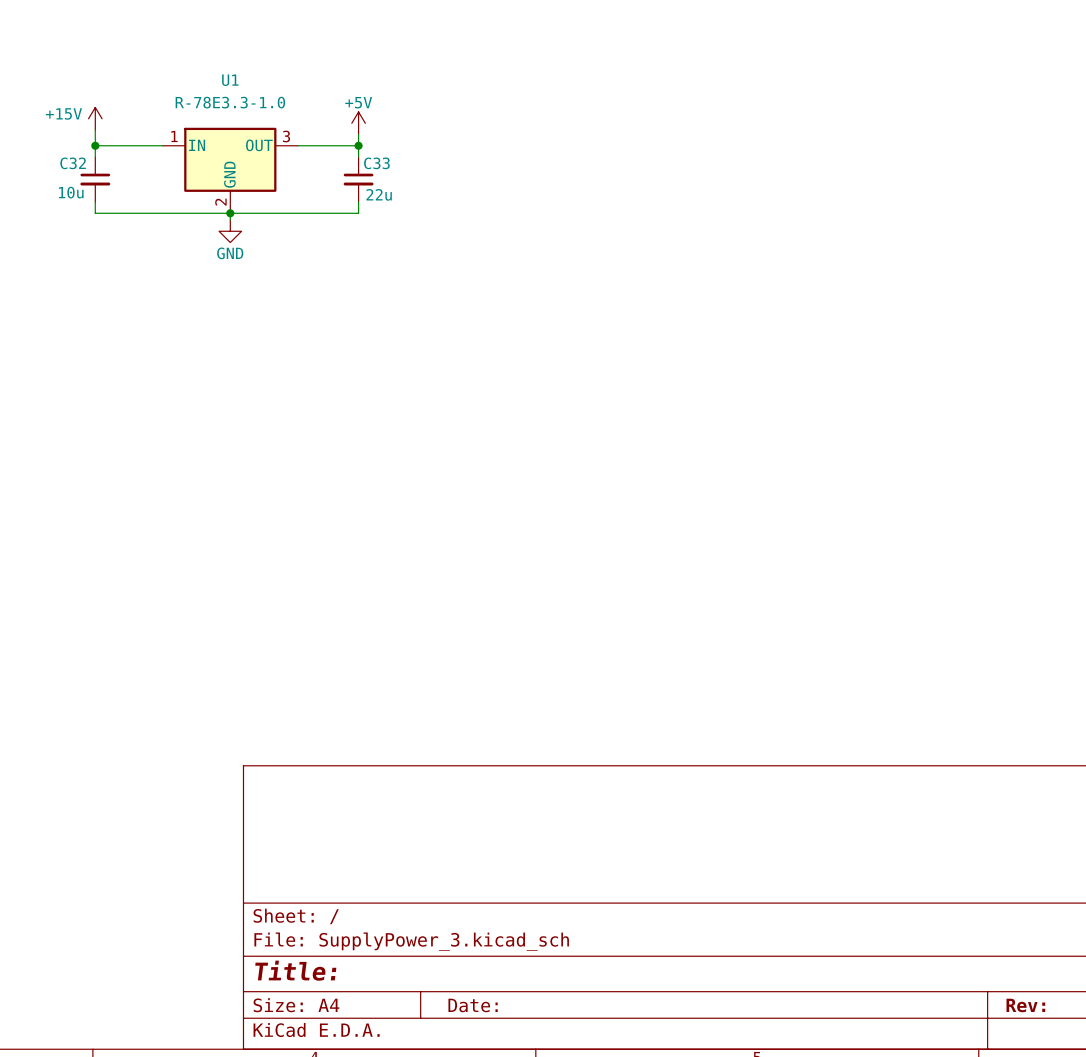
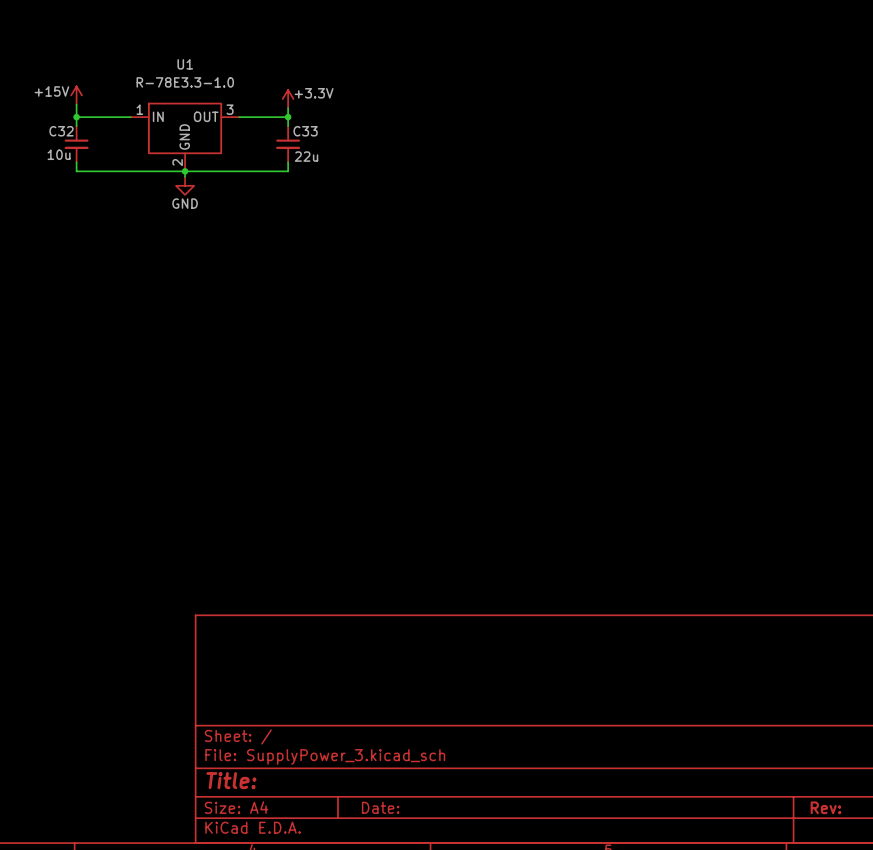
power symbol: +5V (358, 123) -> +3.3V (288, 99)

